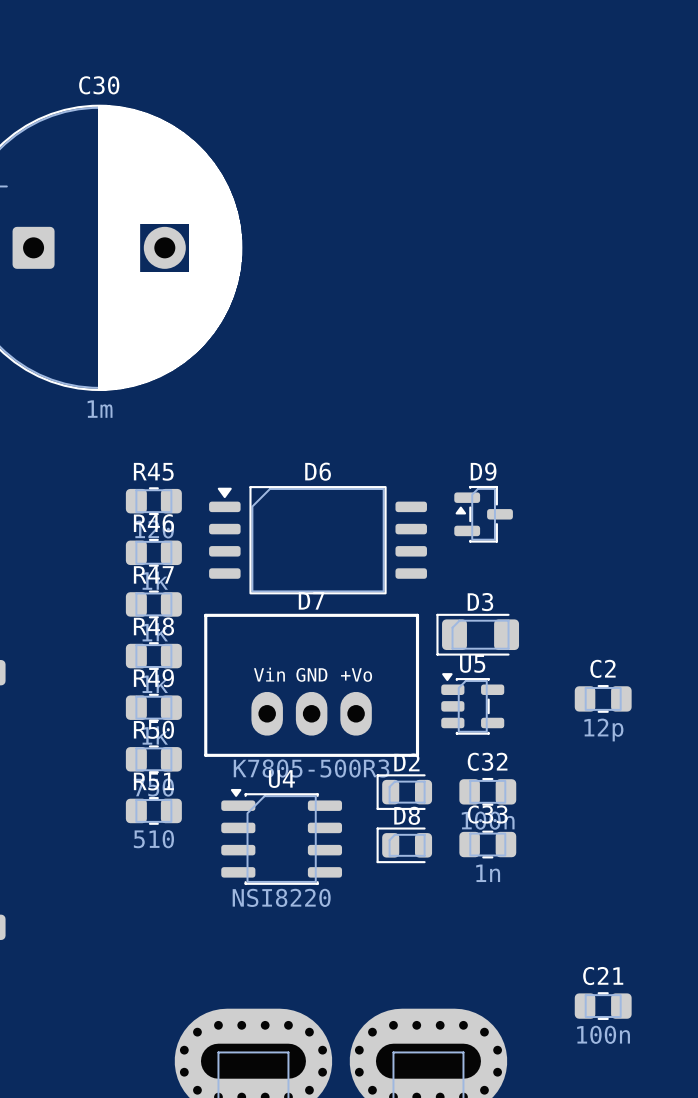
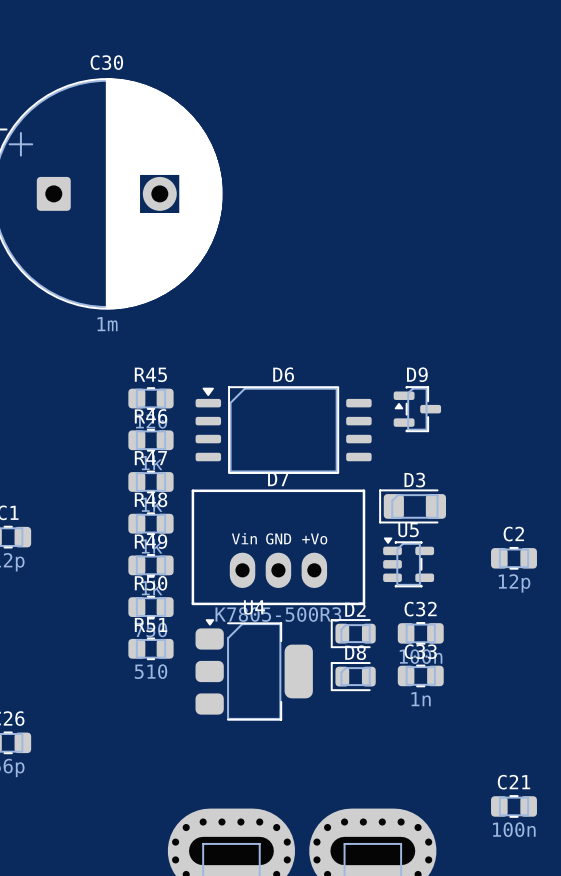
U4 footprint: [221, 788, 343, 885] -> [195, 619, 313, 721]
U4 value: NSI8220 (281, 897) -> none

